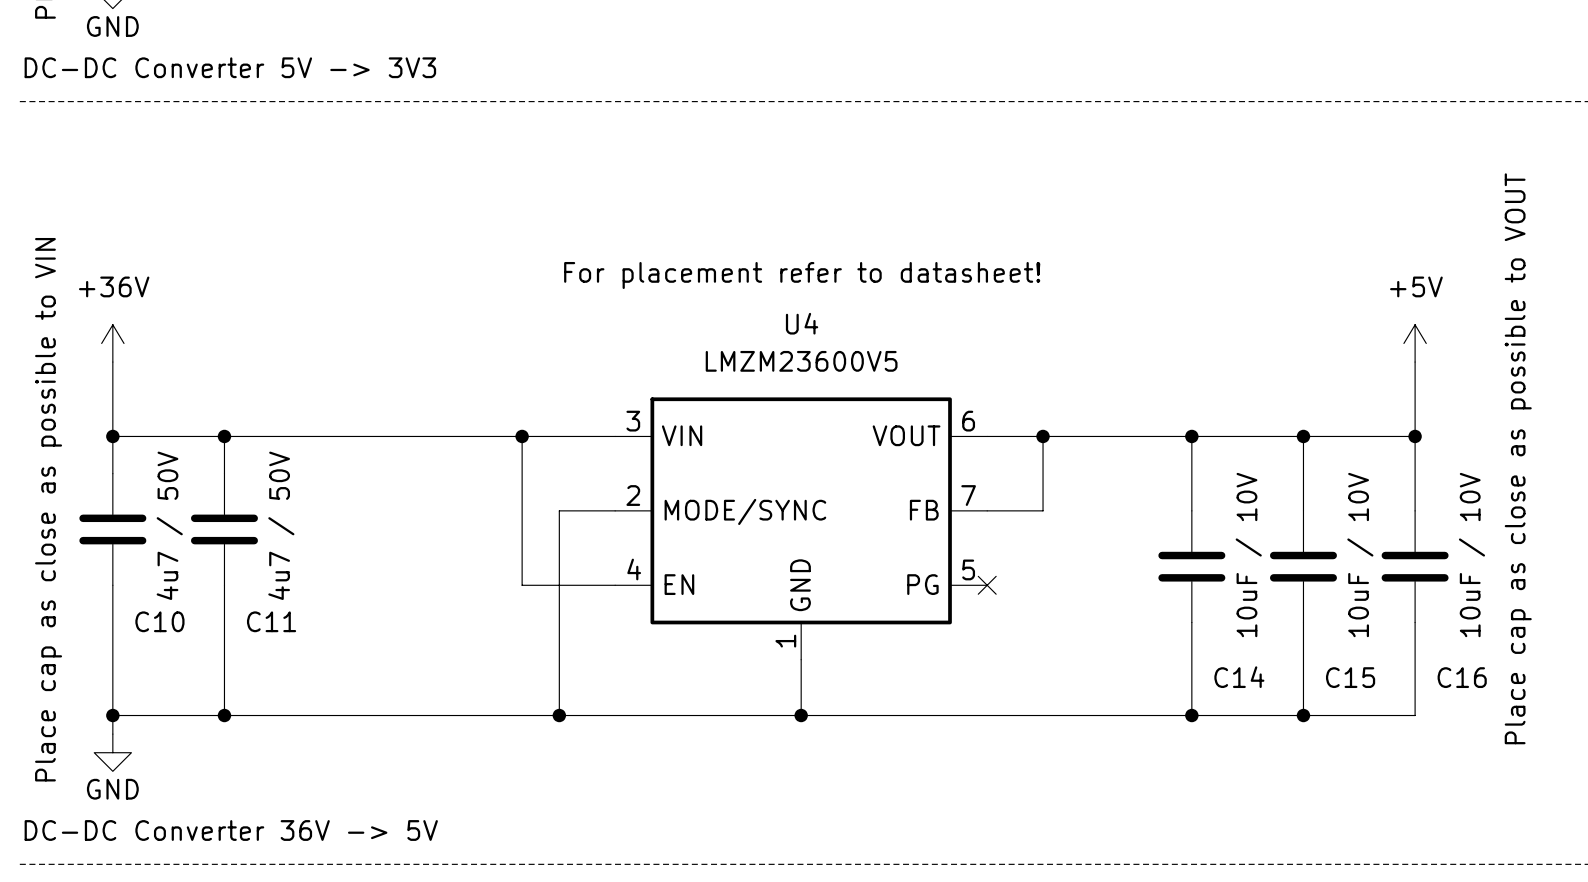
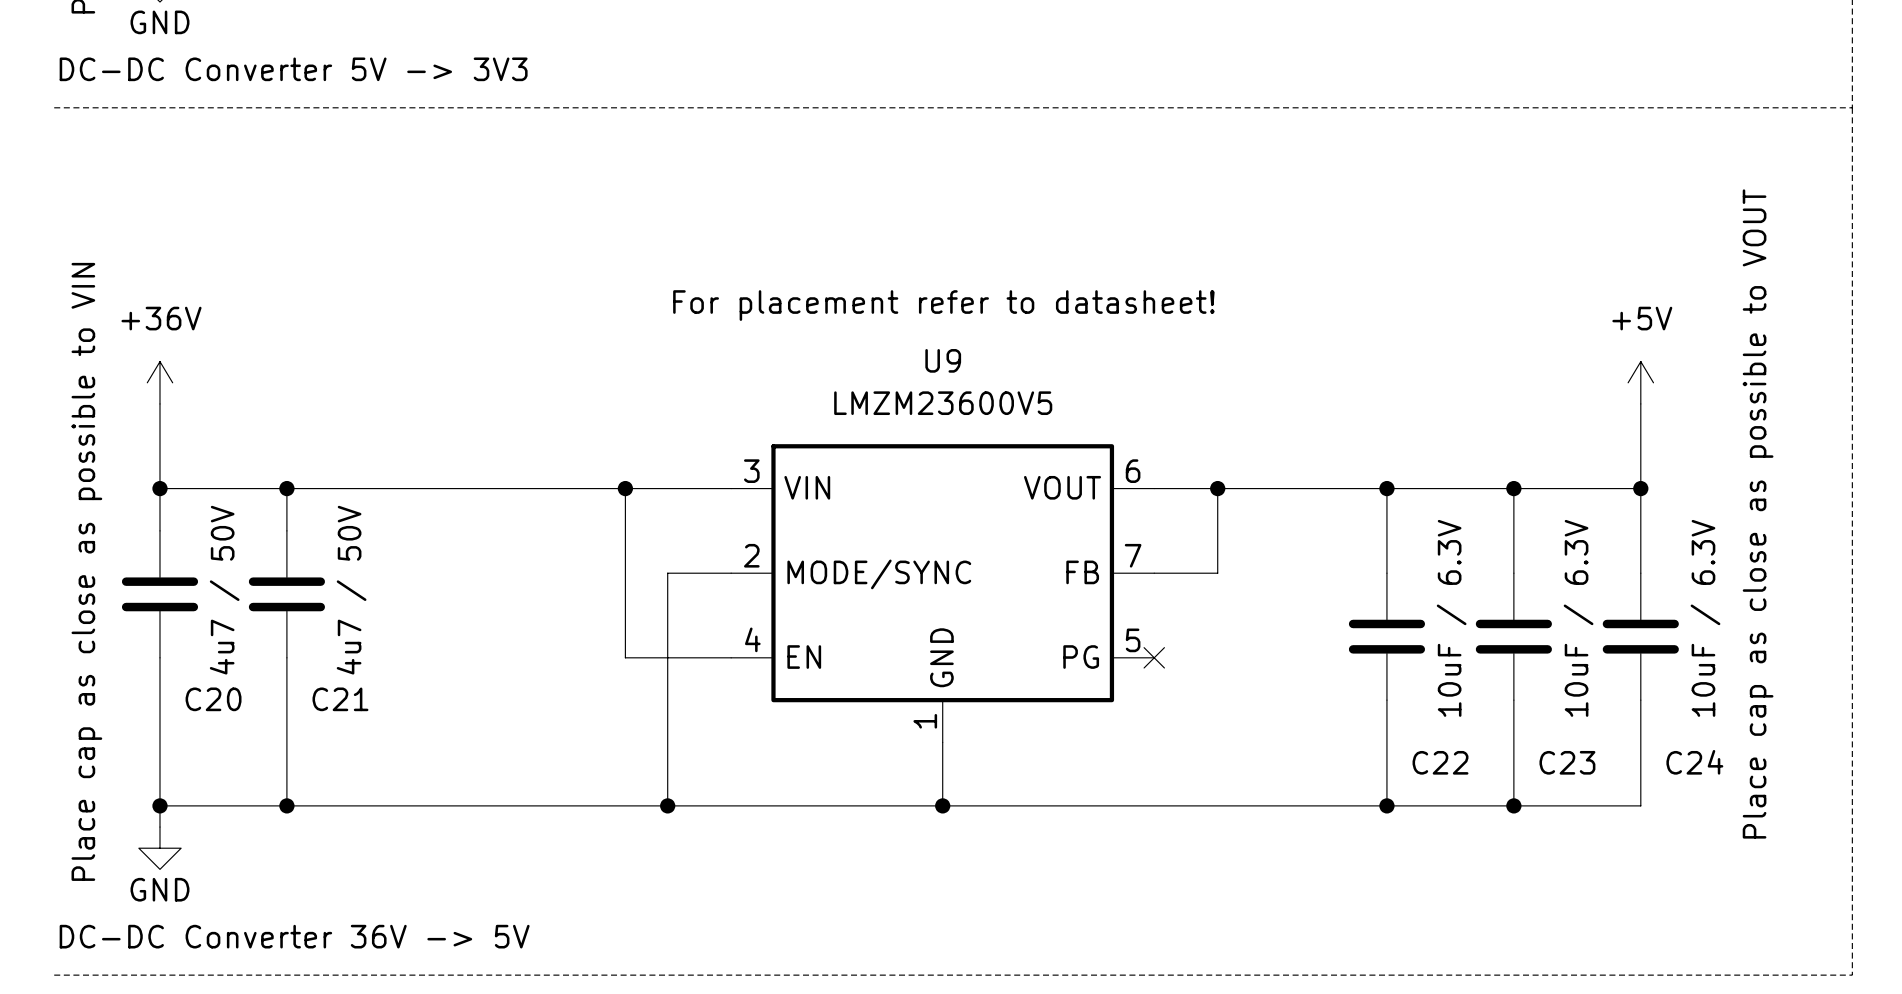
U4 name: U4 (802, 323) -> U9 (943, 360)
C14 value: 10uF / 10V (1248, 555) -> 10uF / 6.3V (1451, 618)
C15 value: 10uF / 10V (1360, 555) -> 10uF / 6.3V (1578, 618)
C16 value: 10uF / 10V (1471, 555) -> 10uF / 6.3V (1705, 618)
C10 name: C10 (159, 621) -> C20 (213, 699)
C11 name: C11 (271, 621) -> C21 (340, 699)
C14 name: C14 (1239, 677) -> C22 (1440, 762)
C15 name: C15 (1350, 677) -> C23 (1567, 762)
C16 name: C16 (1462, 677) -> C24 (1694, 762)

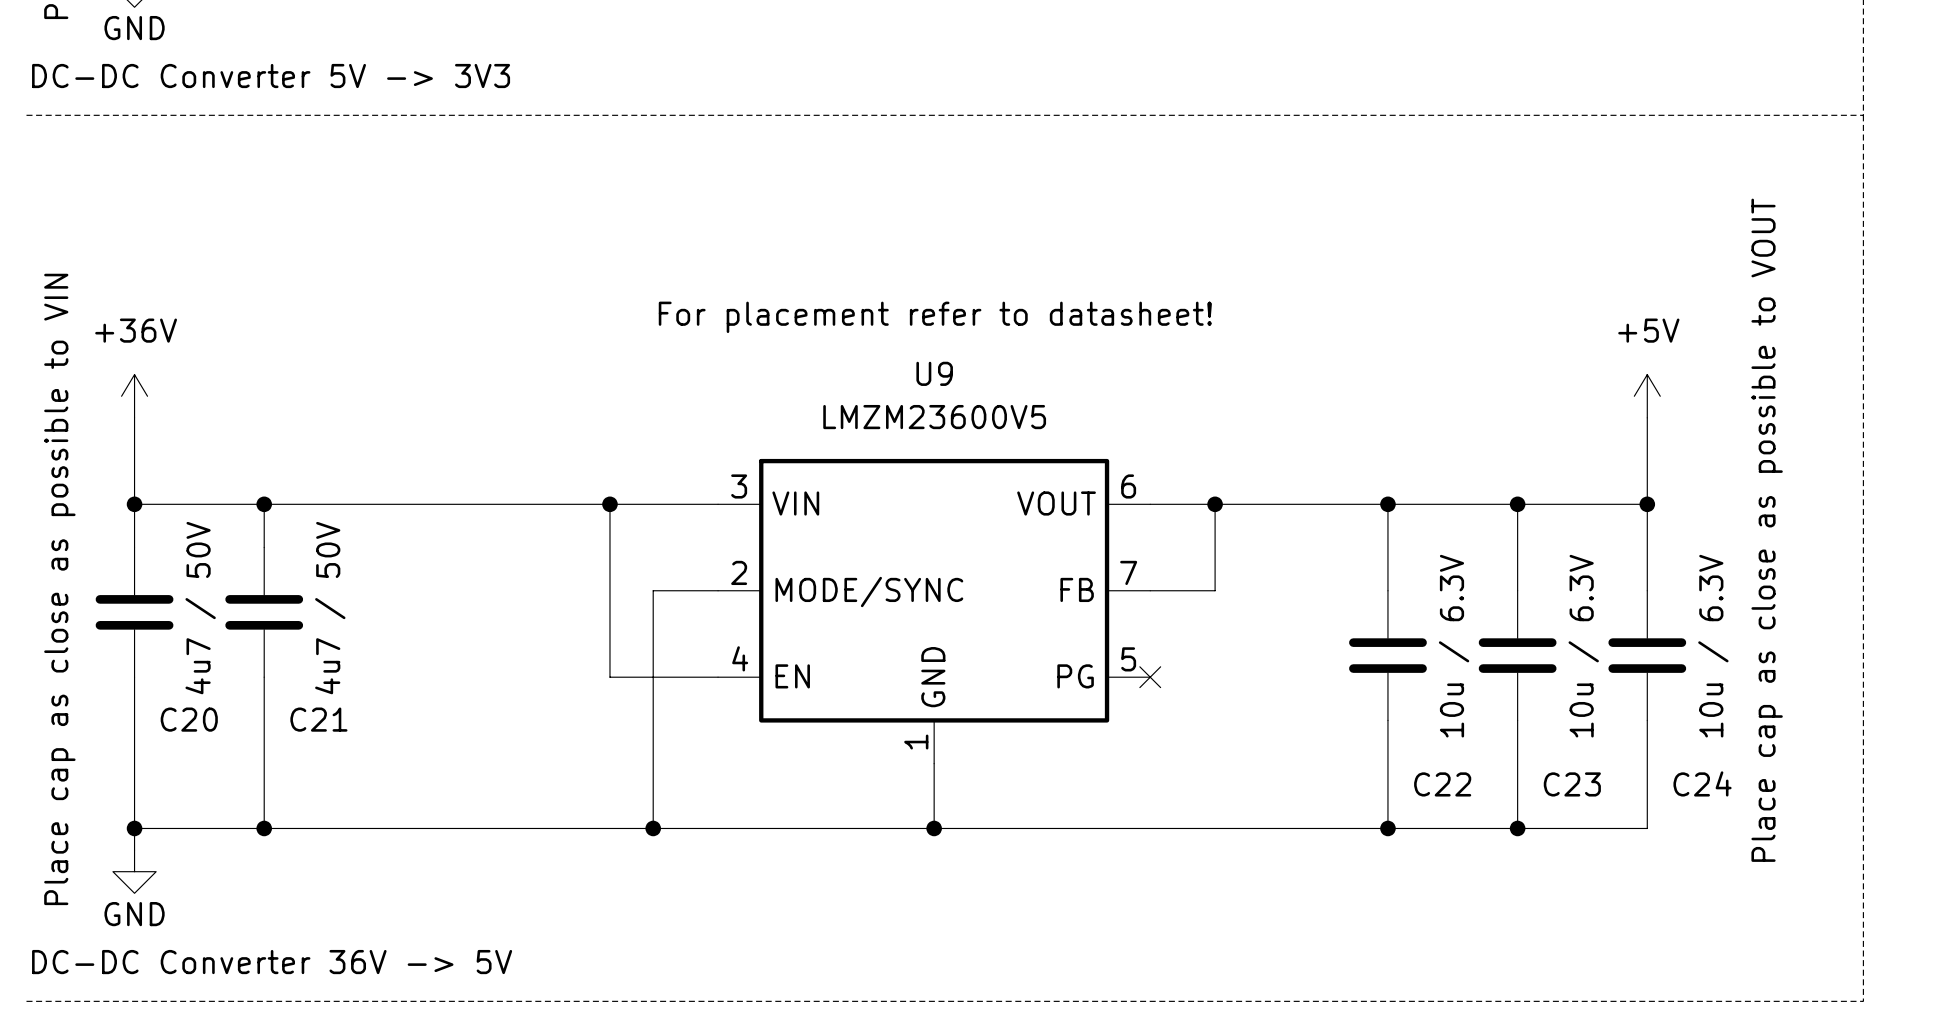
C22 value: 10uF / 6.3V (1451, 618) -> 10u / 6.3V (1454, 646)
C23 value: 10uF / 6.3V (1578, 618) -> 10u / 6.3V (1583, 646)
C24 value: 10uF / 6.3V (1705, 618) -> 10u / 6.3V (1713, 646)

